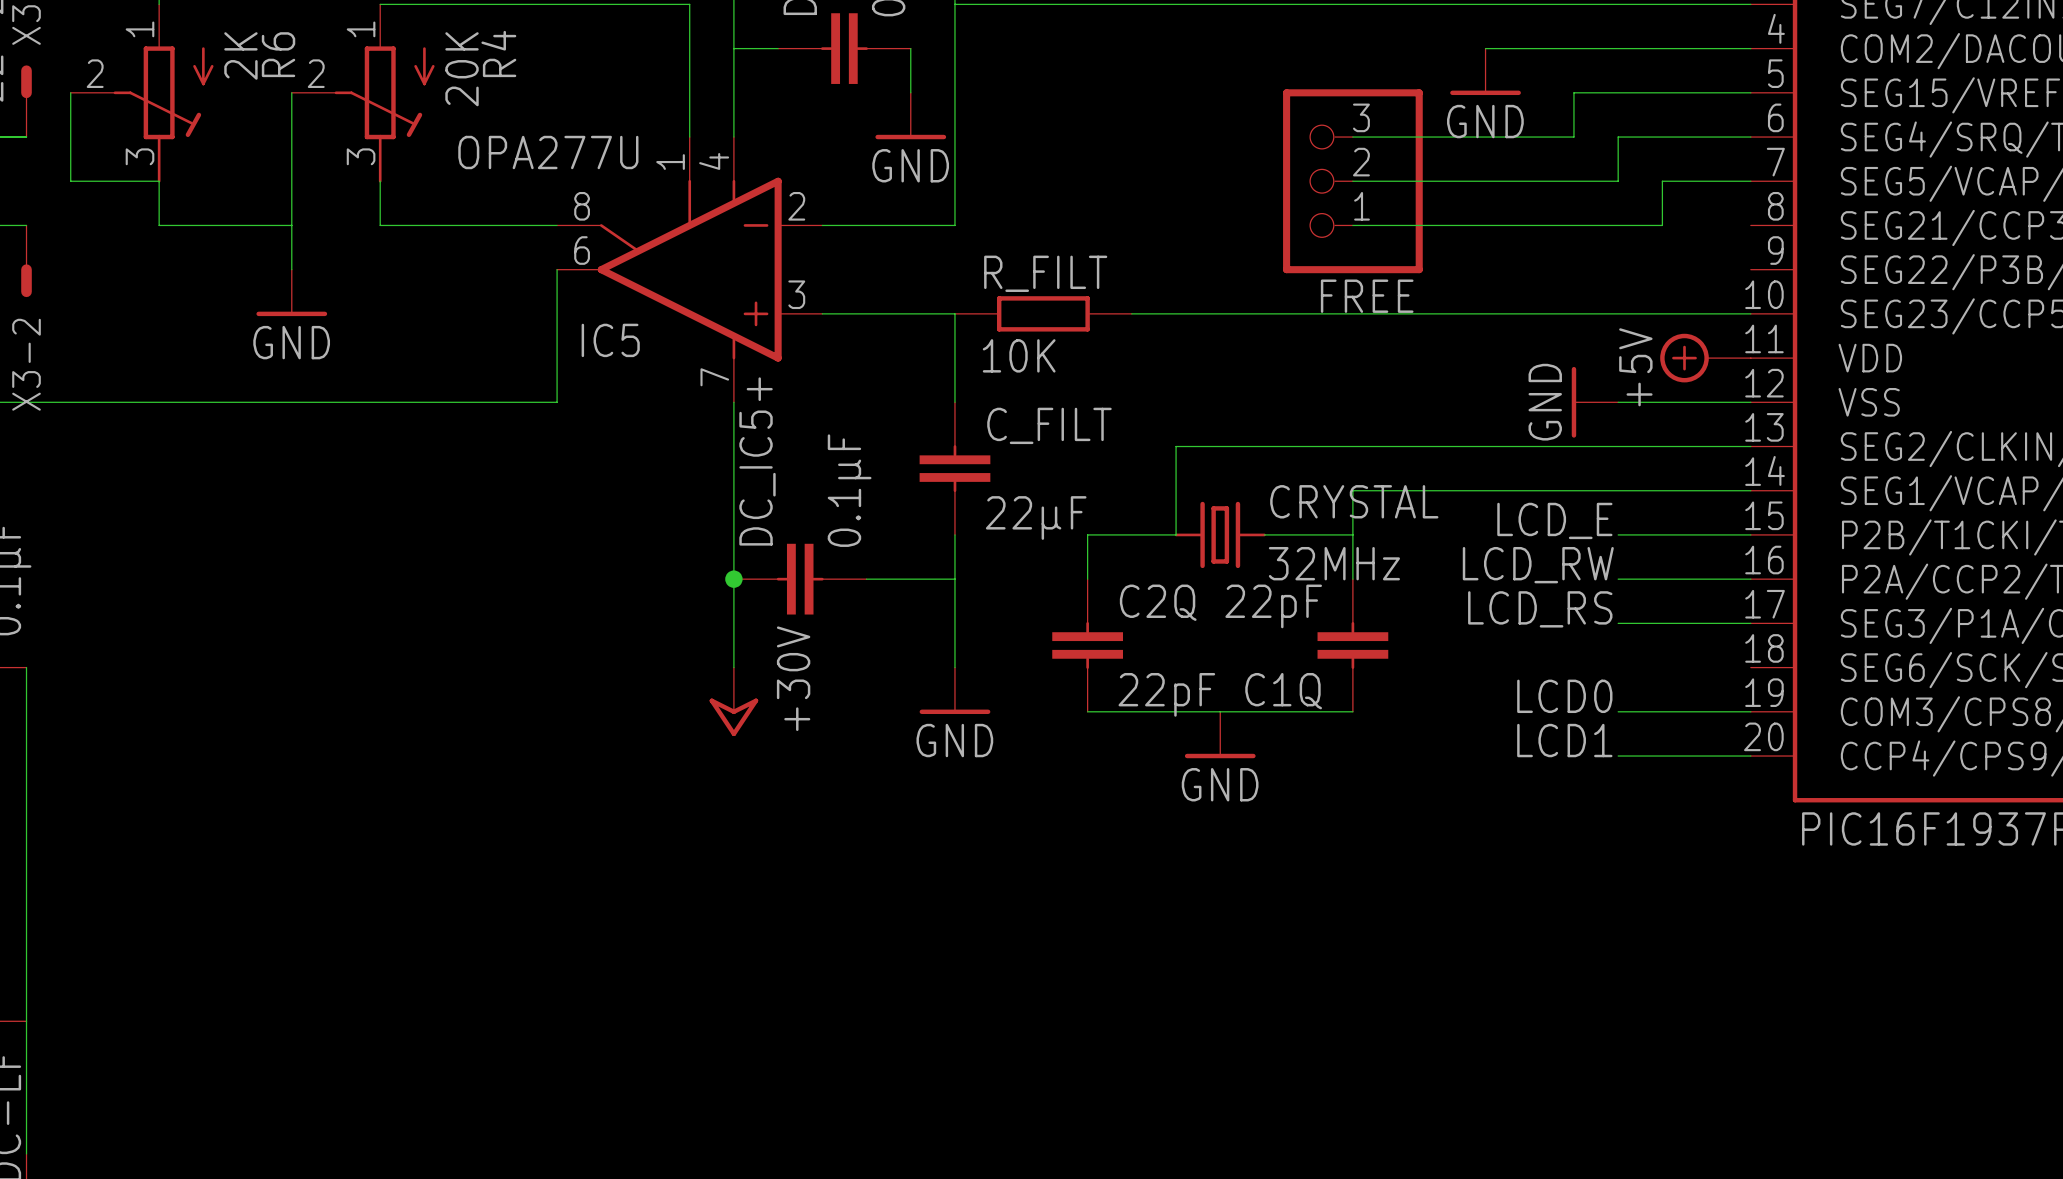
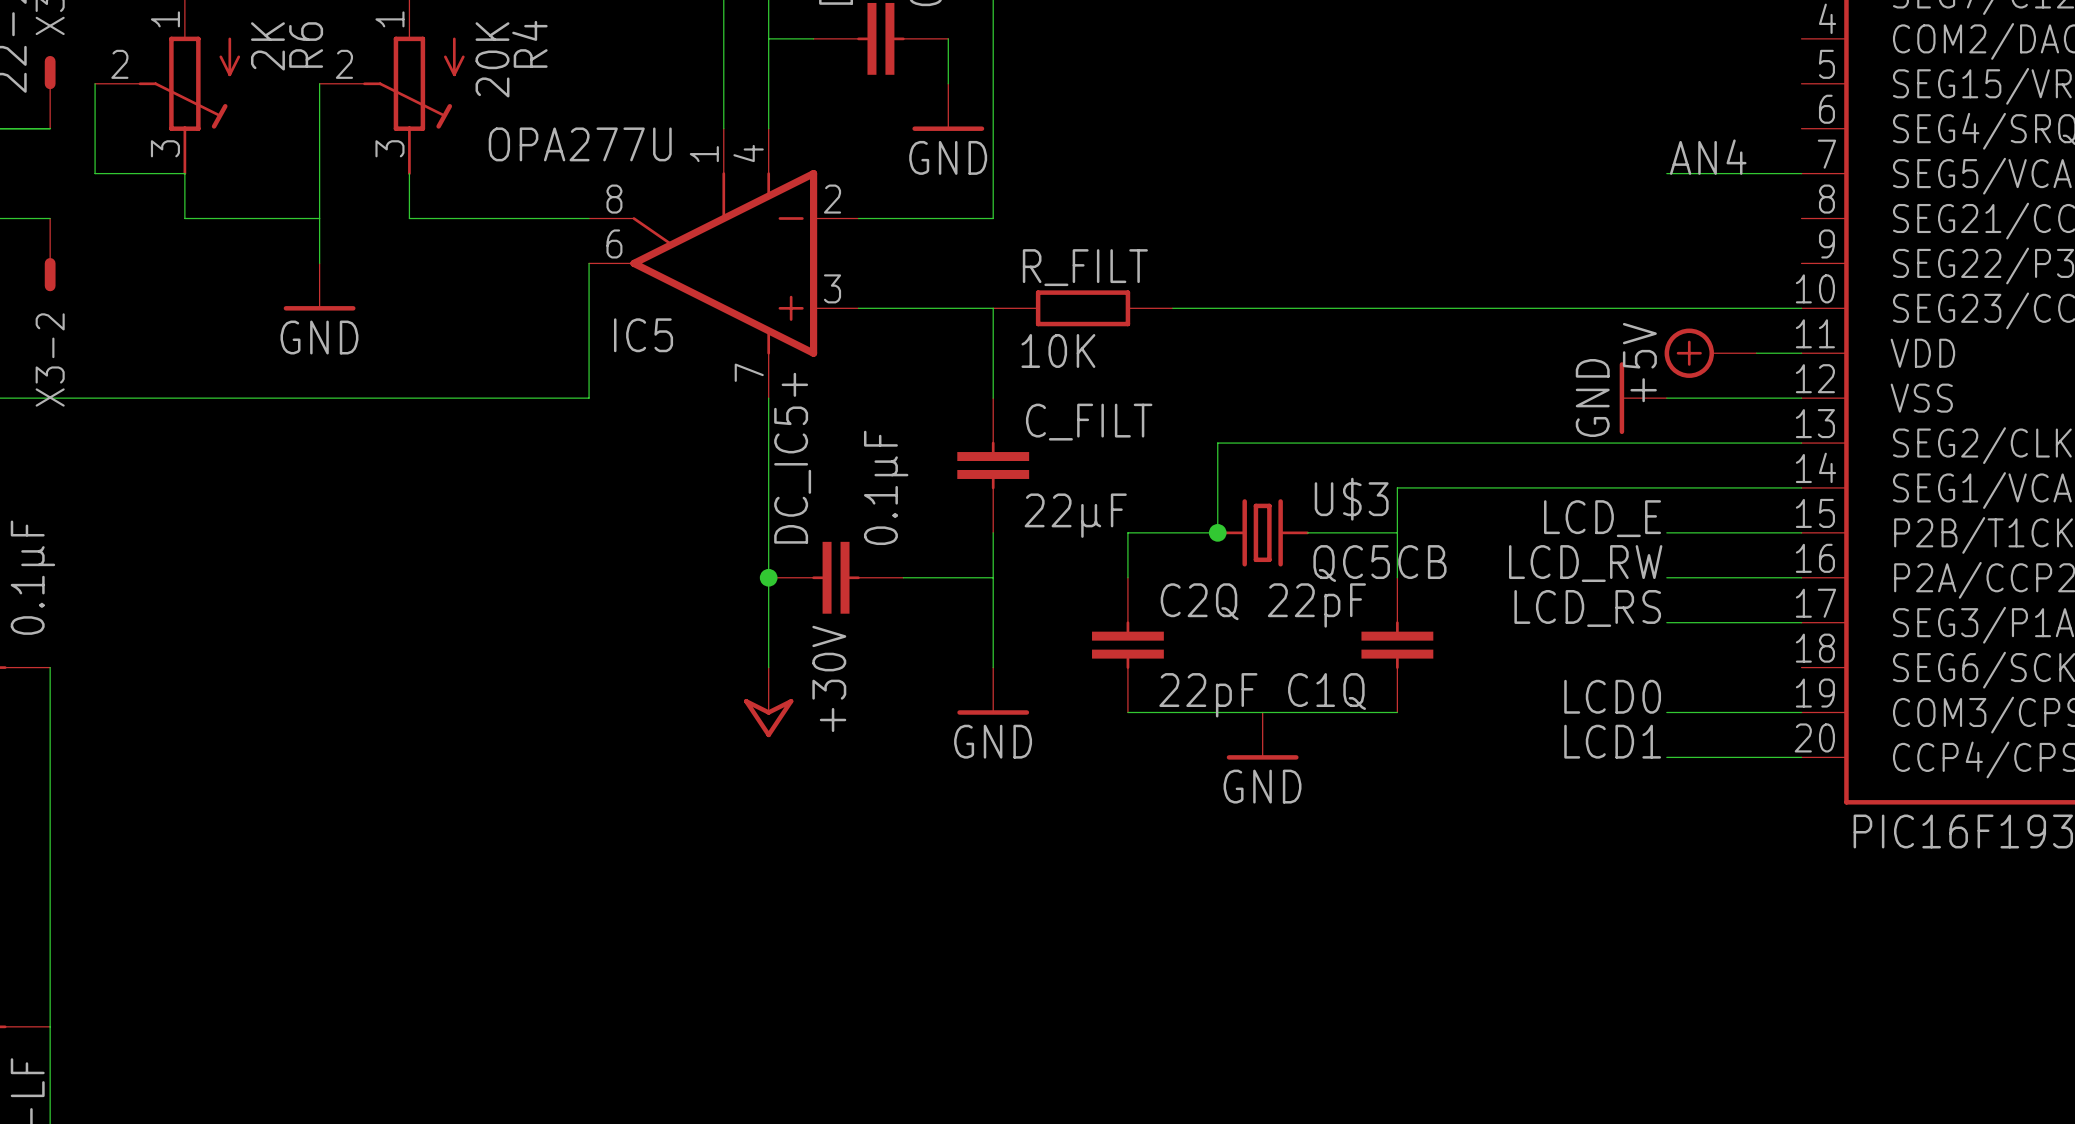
wire: (1485, 48) (1750, 48) -> none
power symbol: GND (1485, 71) -> none
wire: (1750, 92) (1573, 92) (1573, 137) (1352, 137) -> none
wire: (1750, 137) (1618, 137) (1618, 181) (1352, 181) -> none
label: none -> AN4 (1708, 157)
FREE: (1352, 181) -> none
wire: (1662, 181) (1662, 225) (1352, 225) -> (1711, 173) (1666, 173)
power symbol position: +5V (1705, 358) -> +5V (1710, 353)
CRYSTAL name: CRYSTAL (1354, 501) -> U$3 (1351, 499)
junction: none -> (1217, 532)
CRYSTAL value: 32MHz (1334, 563) -> QC5CB (1379, 563)

